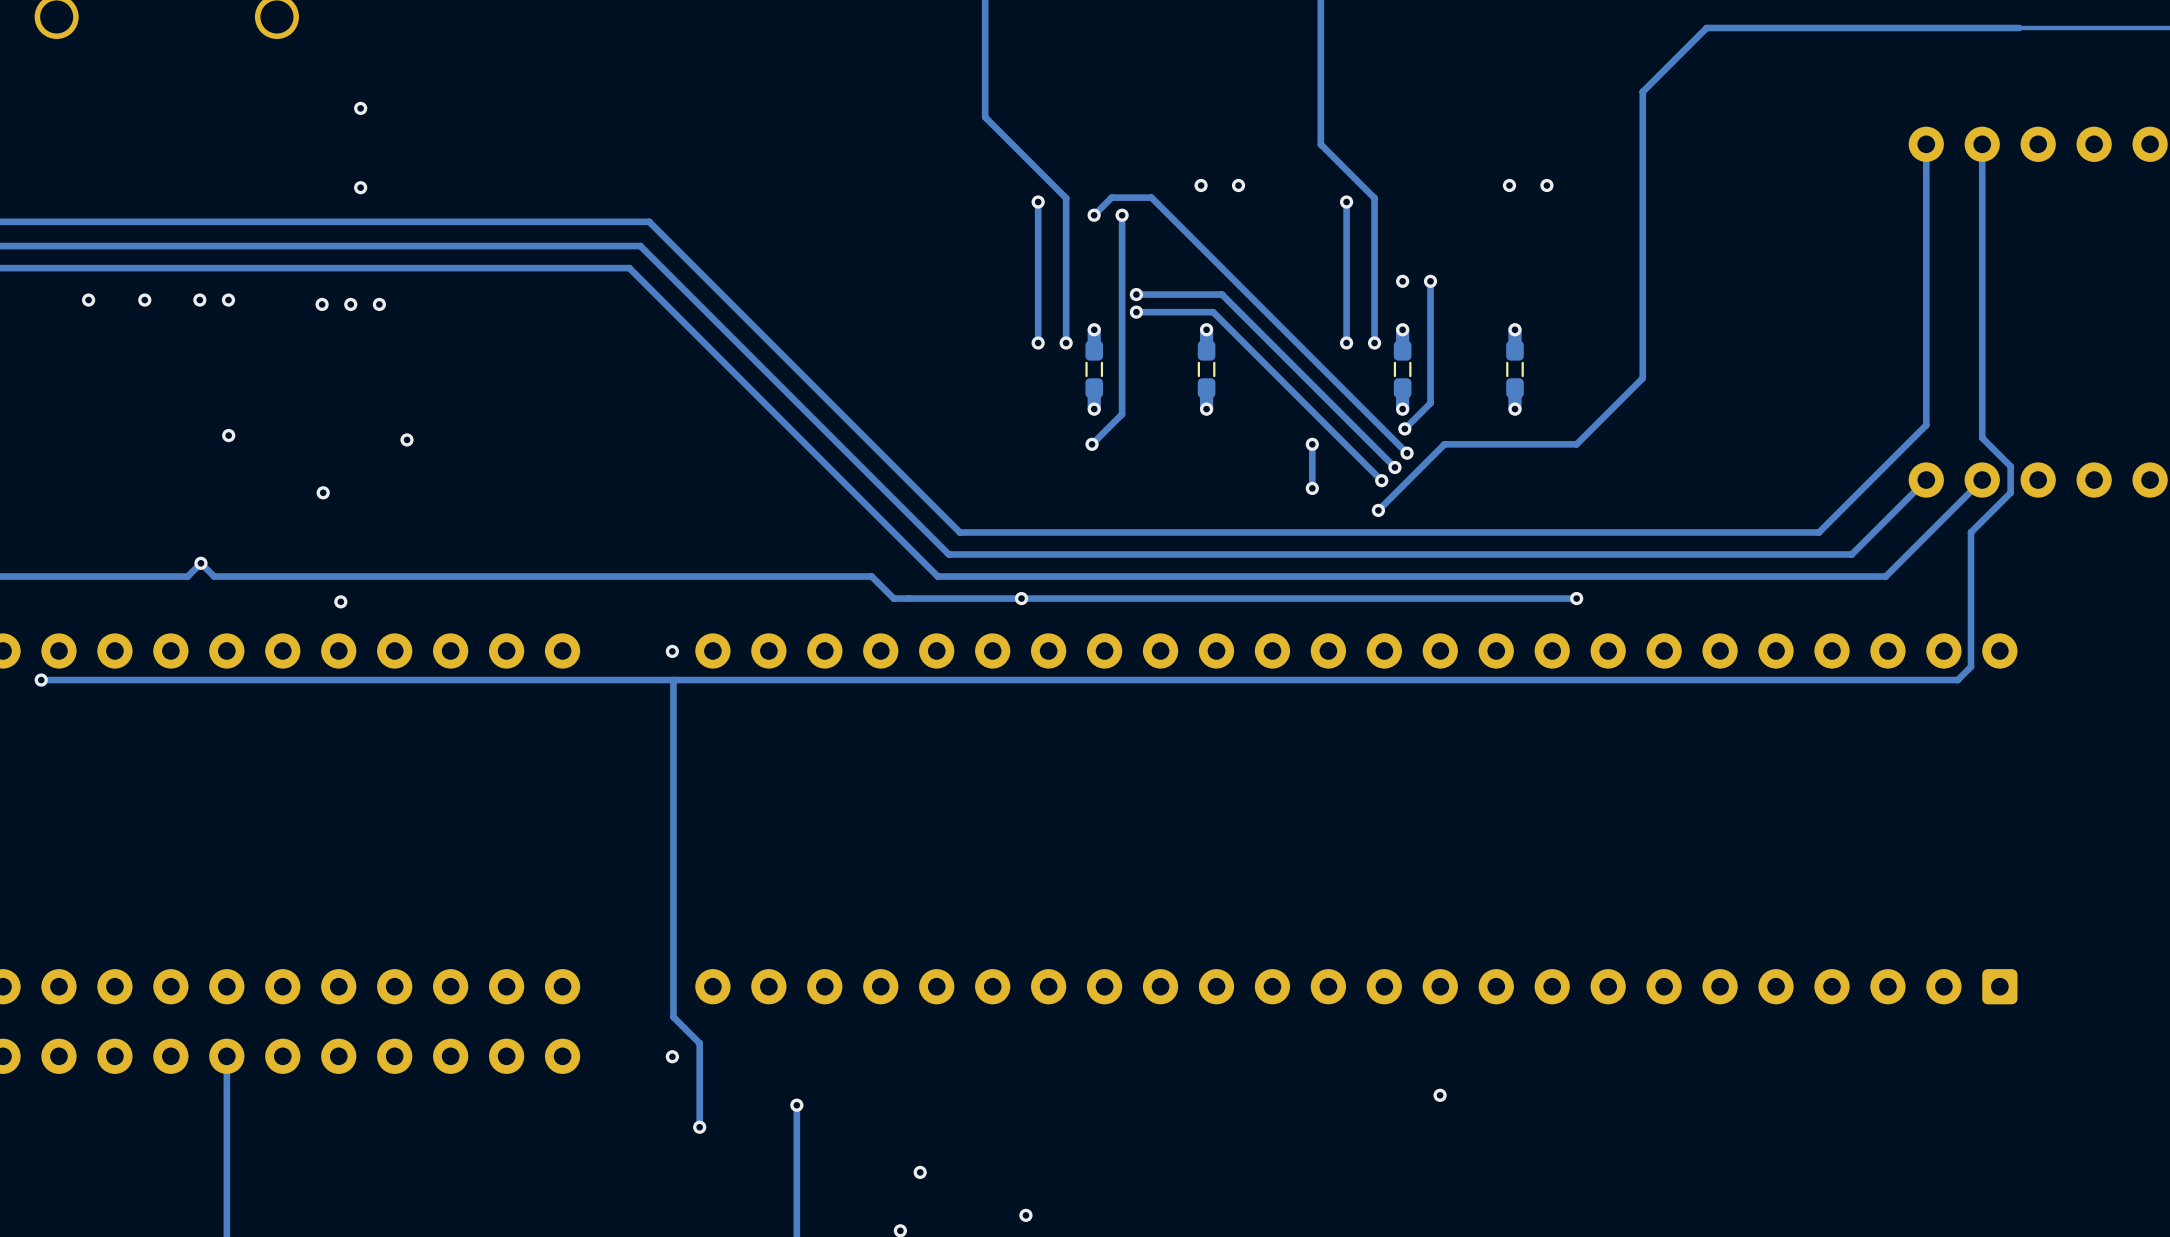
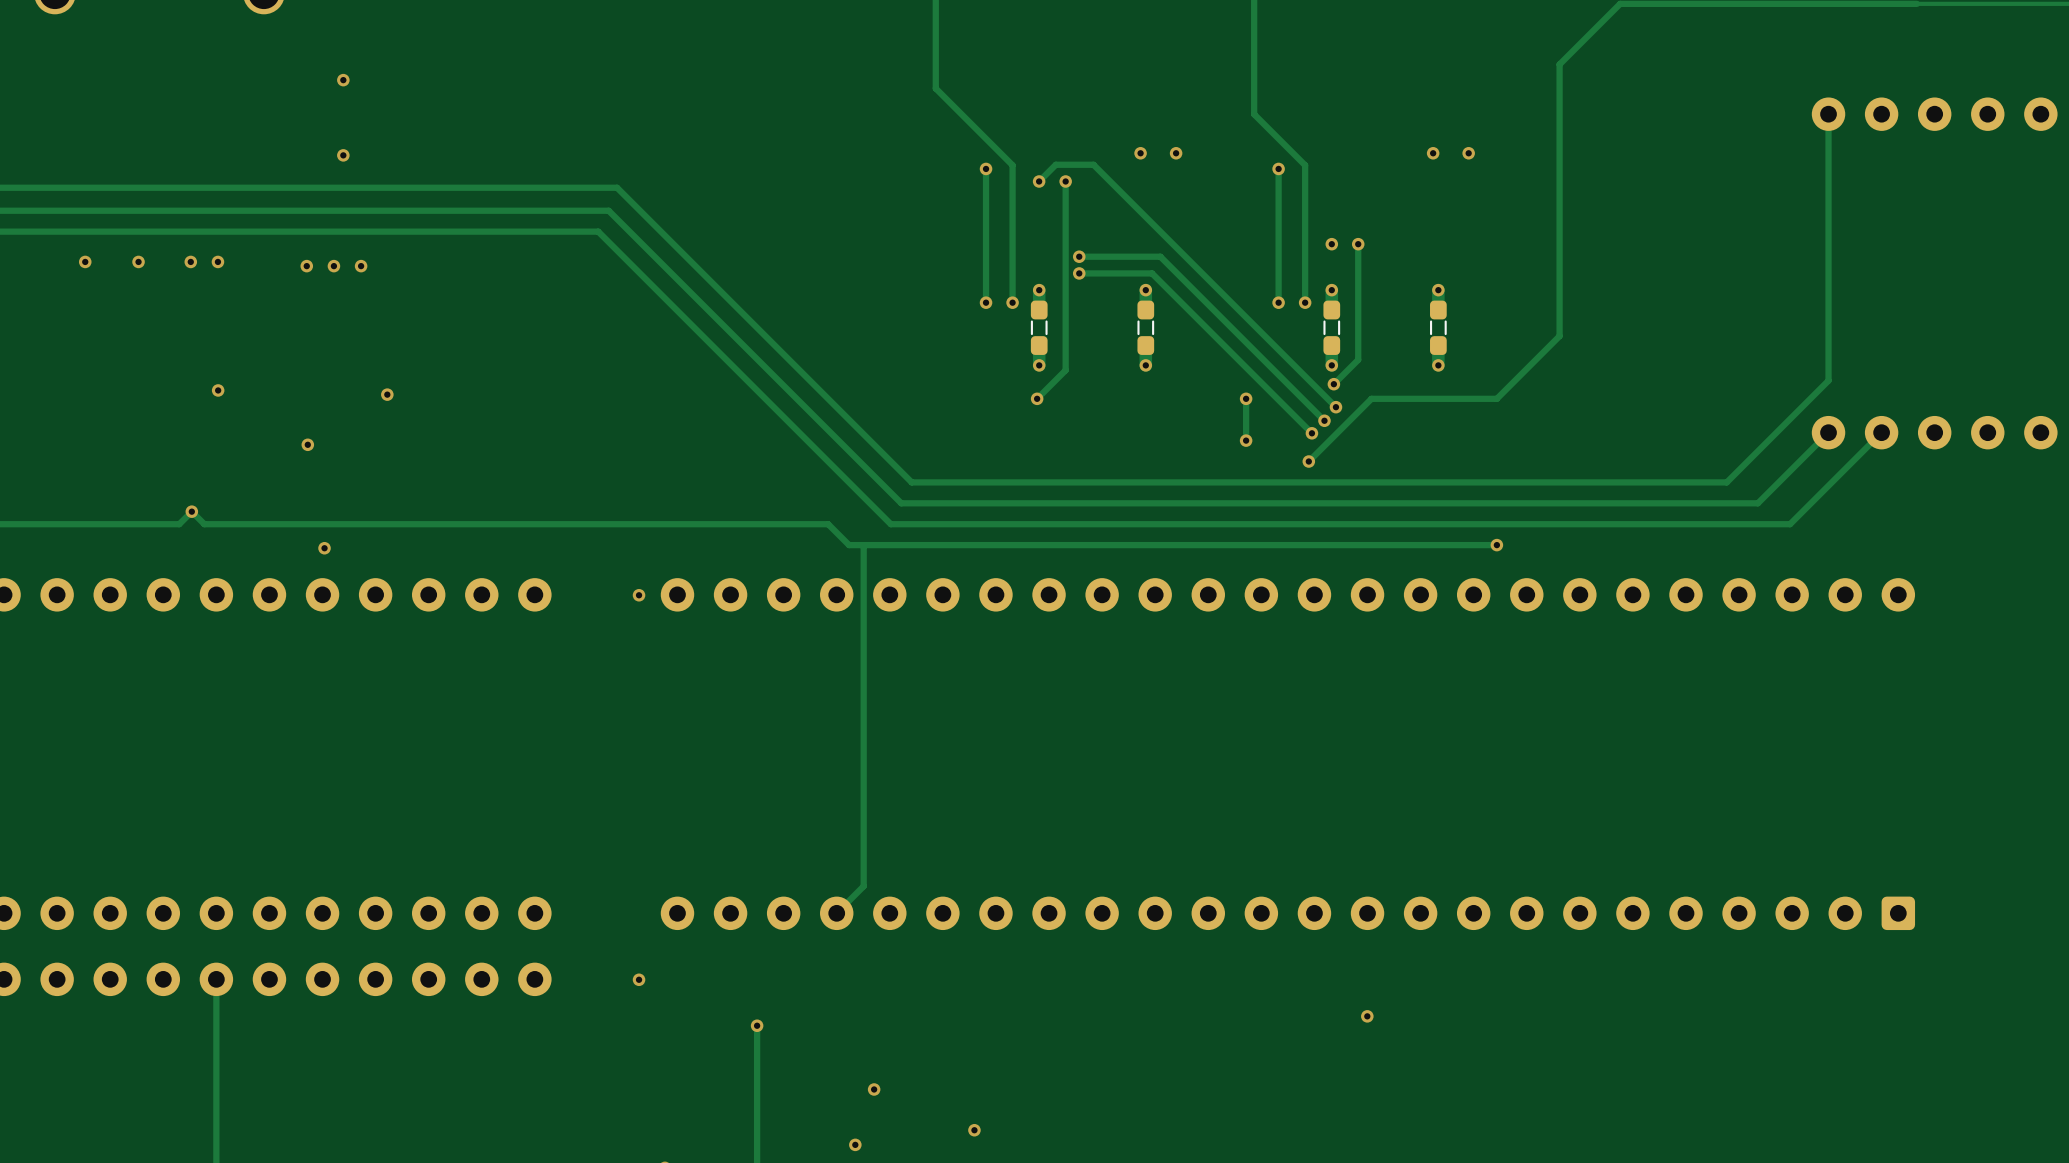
track: (1982, 144) (1982, 437) (2010, 466) (2010, 492) (1971, 532) (1971, 666) (1957, 680) (41, 680) -> none
track: none -> (863, 545) (863, 886) (836, 913)
via: (1021, 598) -> none
via: (41, 680) -> none
track: (673, 680) (673, 1017) (699, 1043) (699, 1127) -> none
via: (699, 1127) -> none

